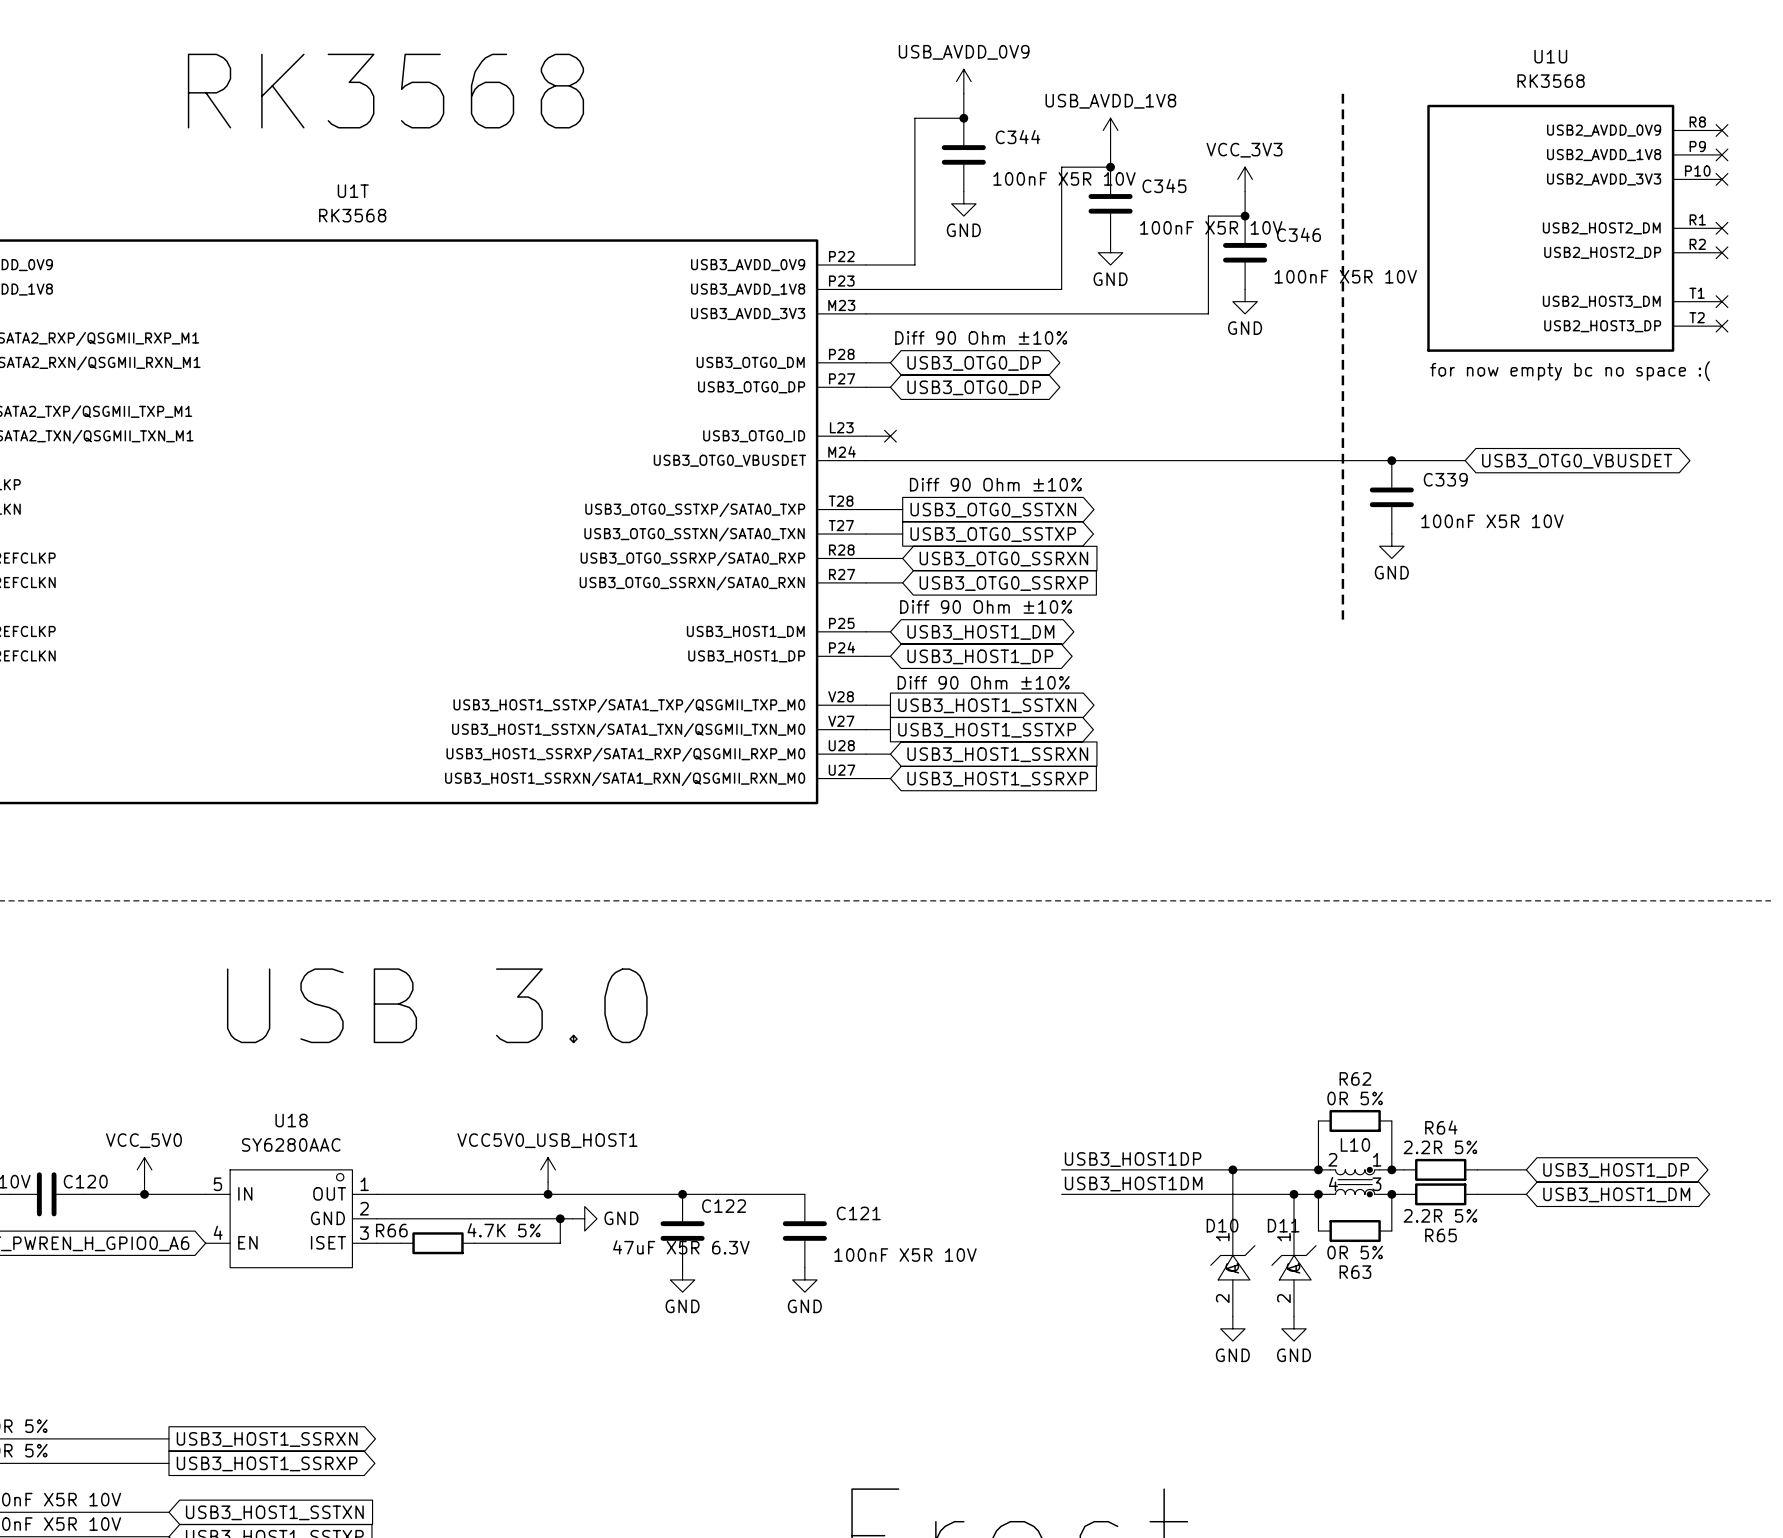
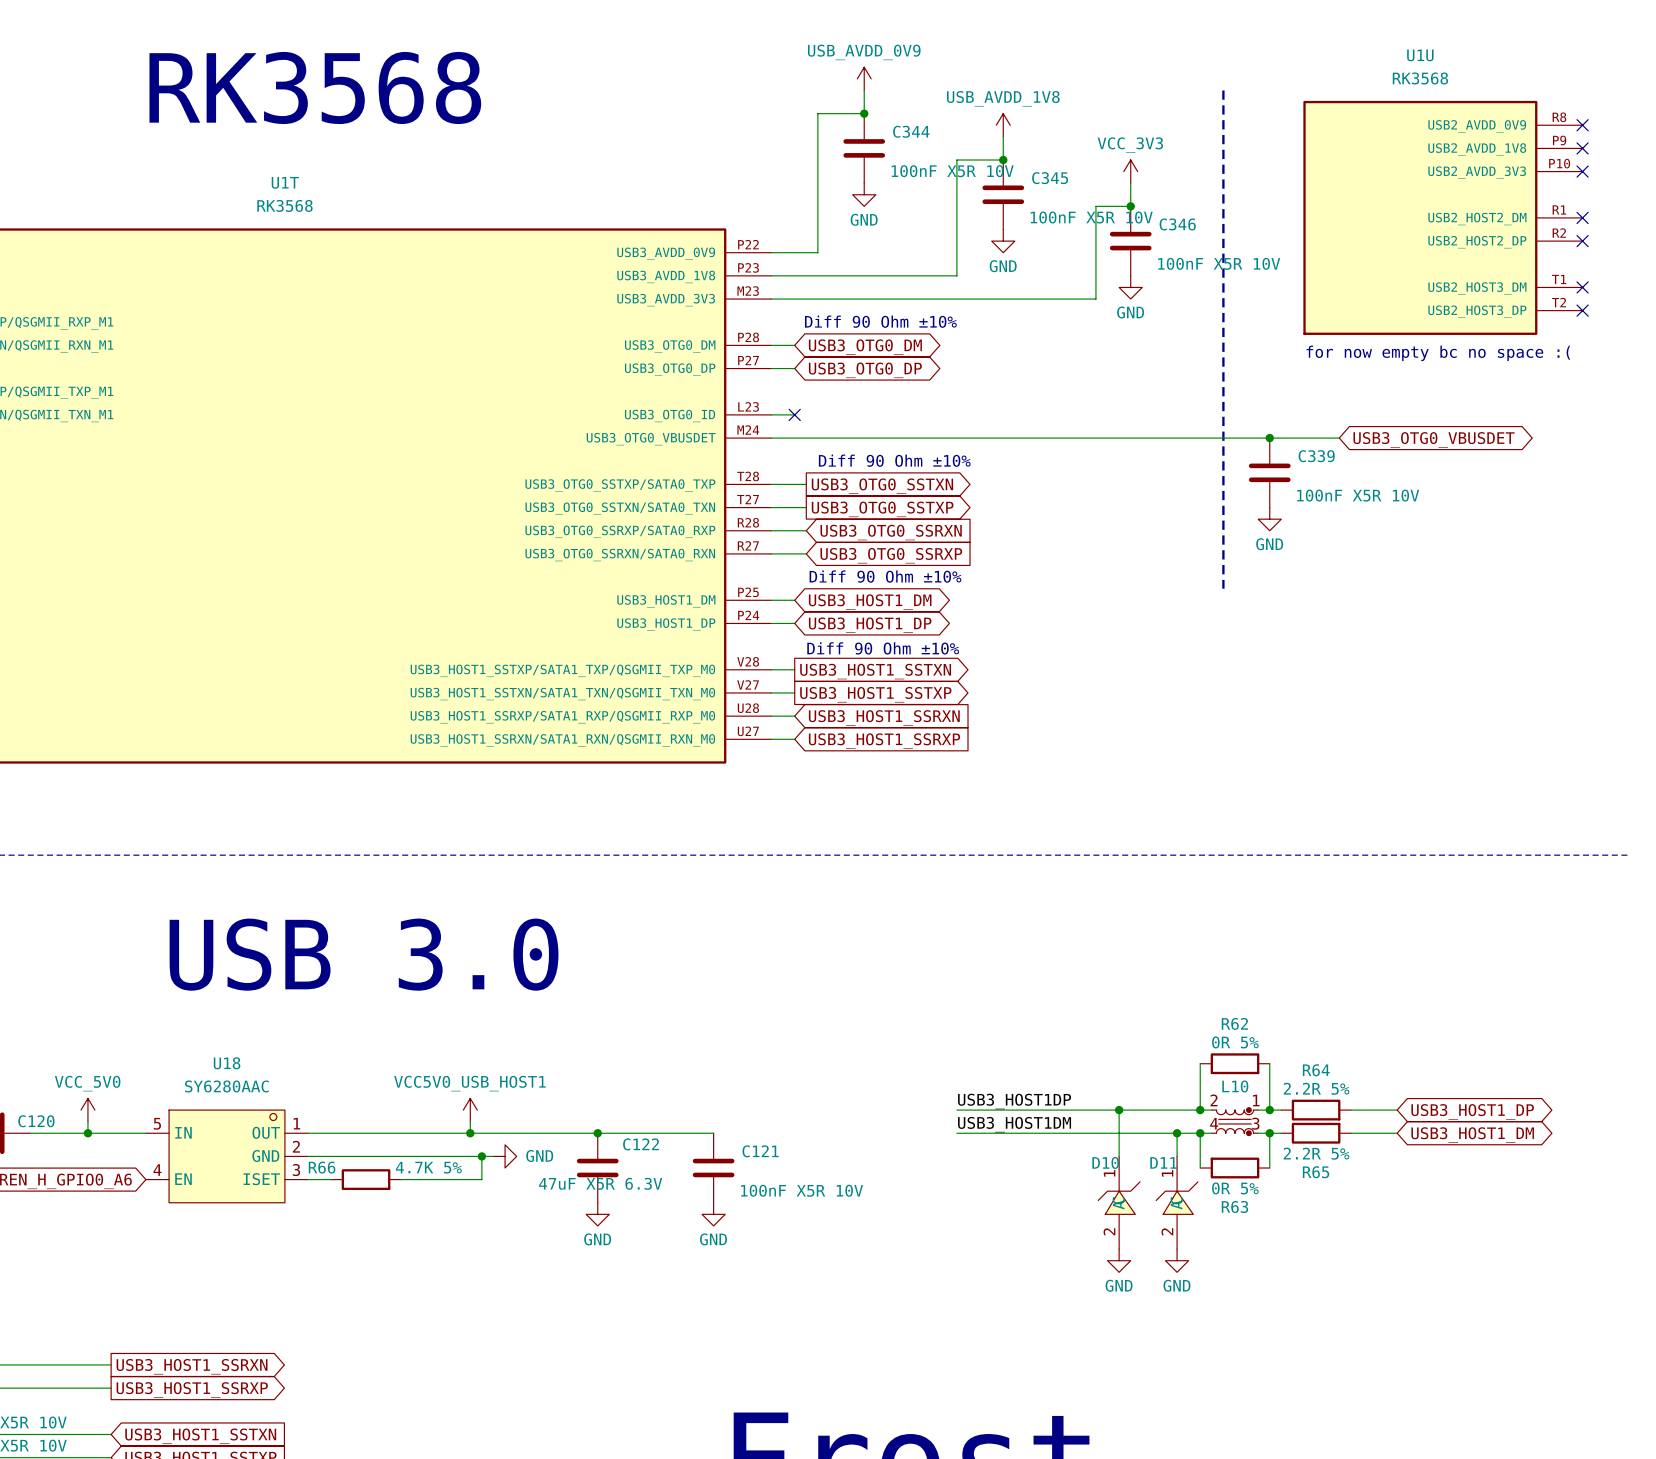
global label: USB3_OTG0_DP (974, 363) -> USB3_OTG0_DM (865, 347)

